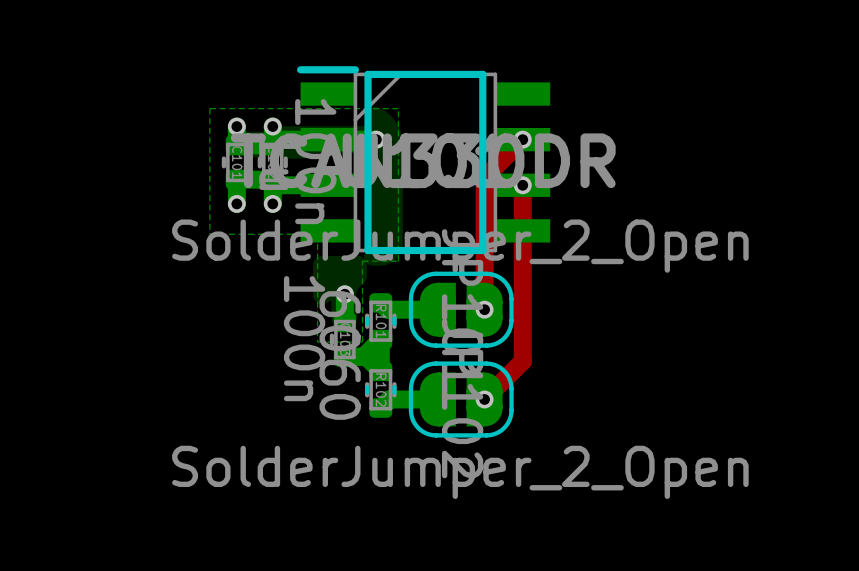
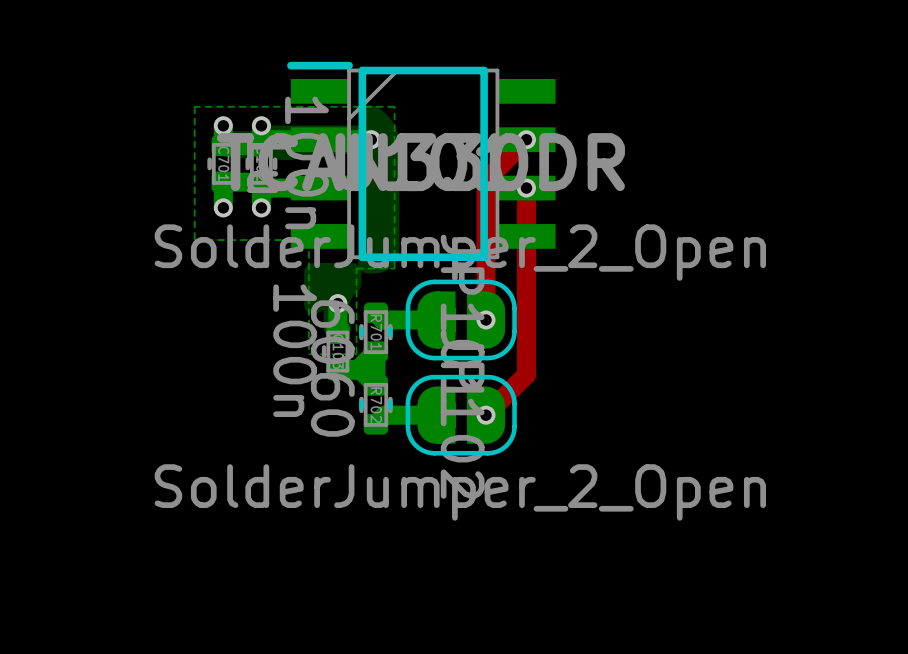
C101 name: C101 (237, 162) -> C701 (223, 163)
R101 name: R101 (381, 321) -> R701 (376, 332)
R102 name: R102 (381, 390) -> R702 (376, 405)

